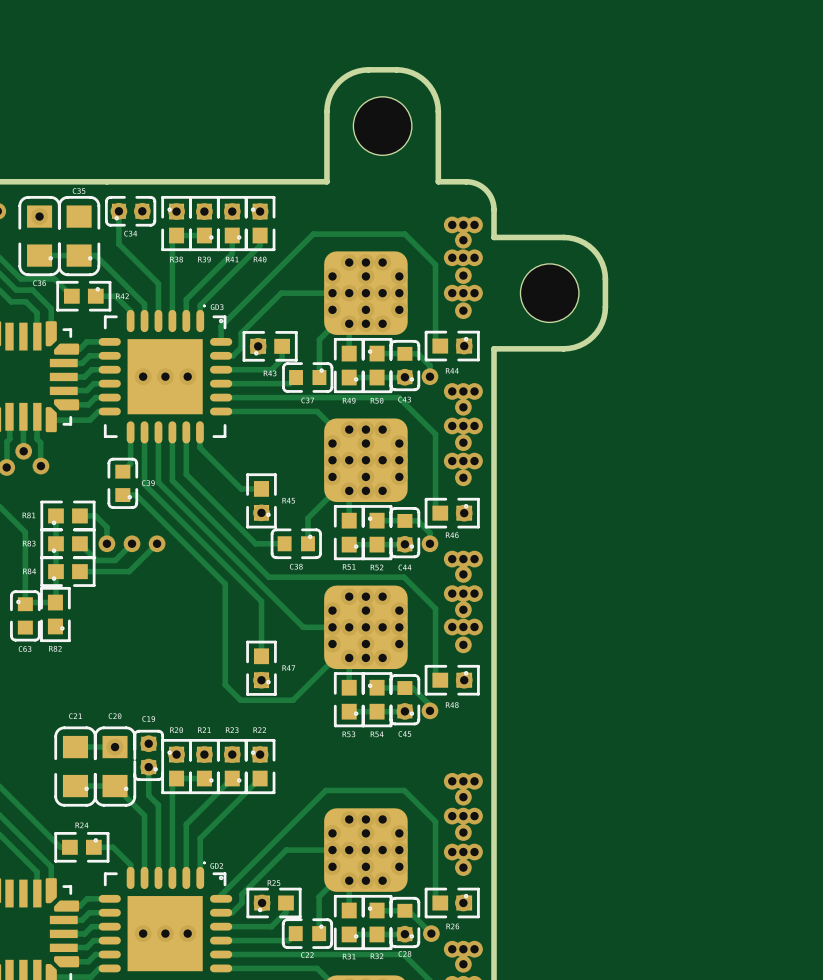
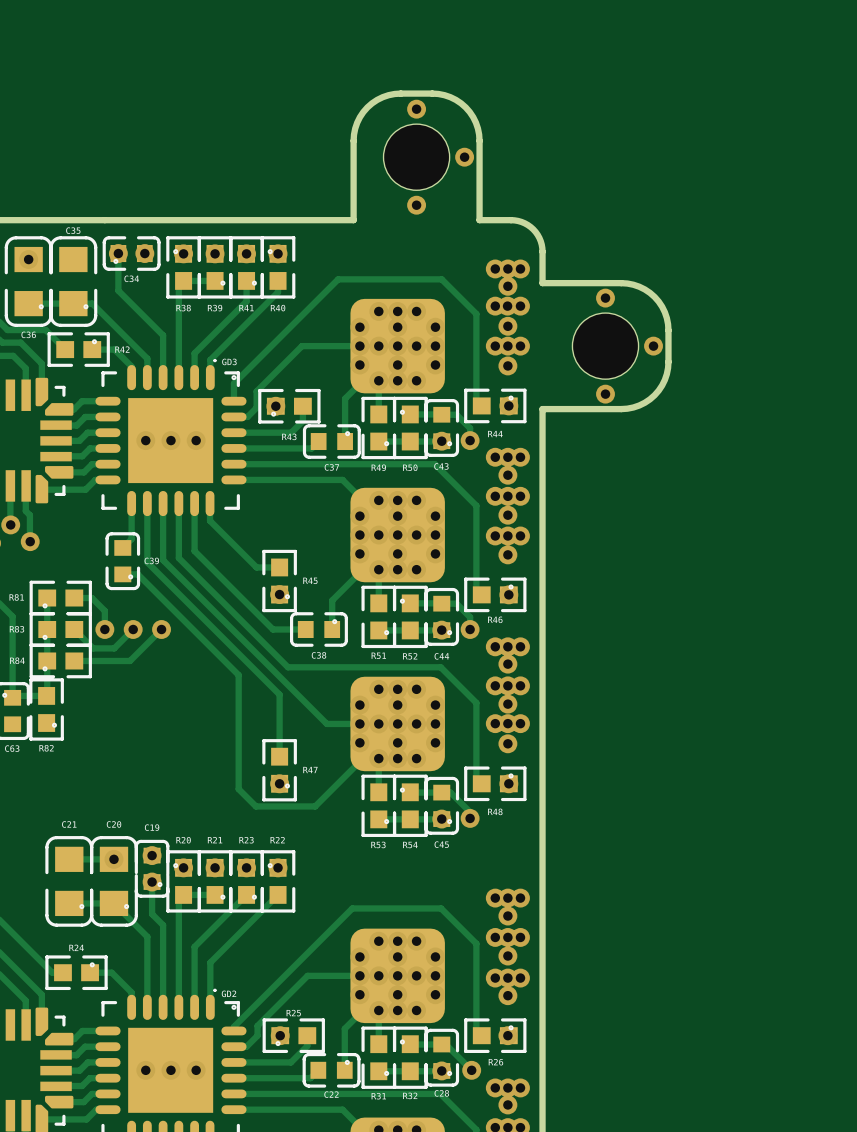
via: none -> (416, 109)
via: none -> (464, 157)
via: none -> (416, 205)
via: none -> (605, 298)
via: none -> (653, 346)
via: none -> (605, 394)

